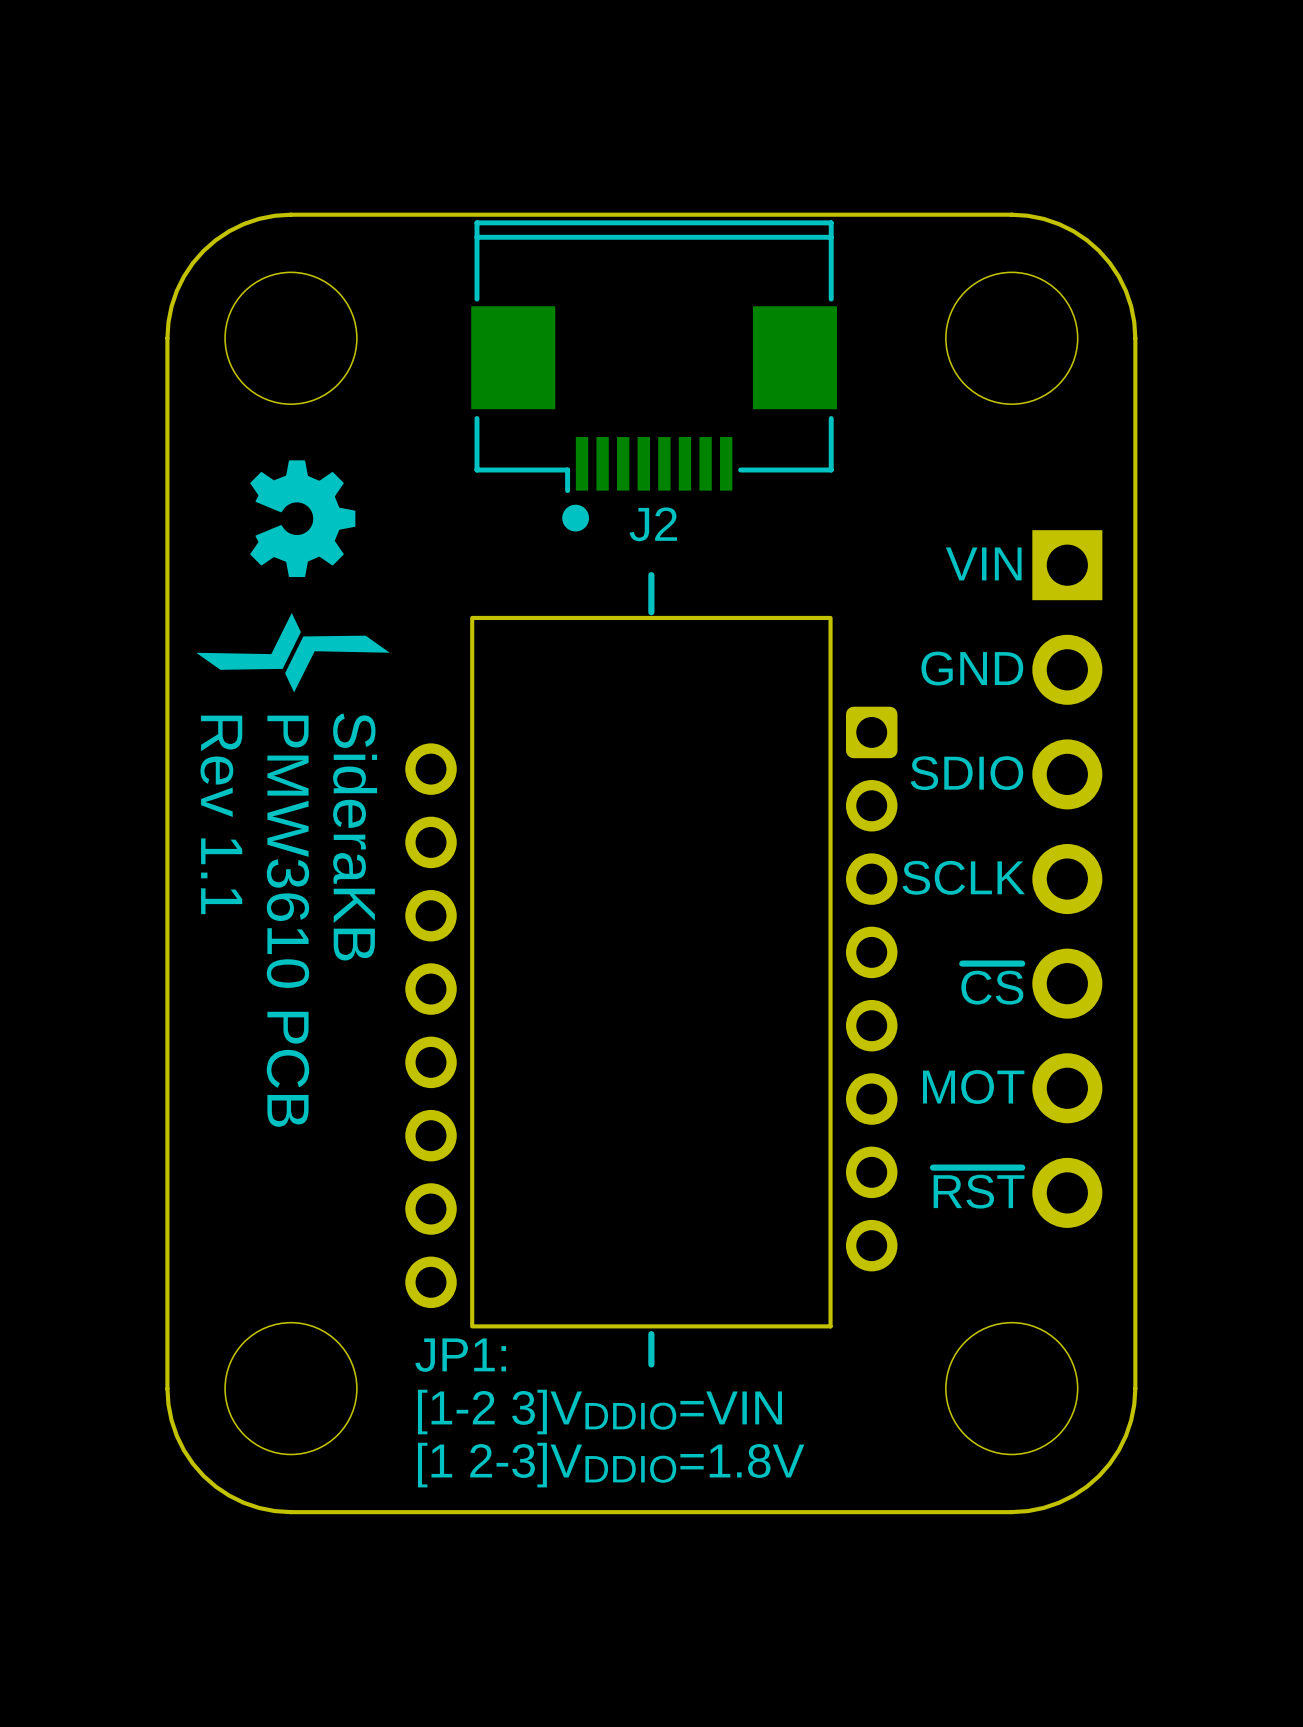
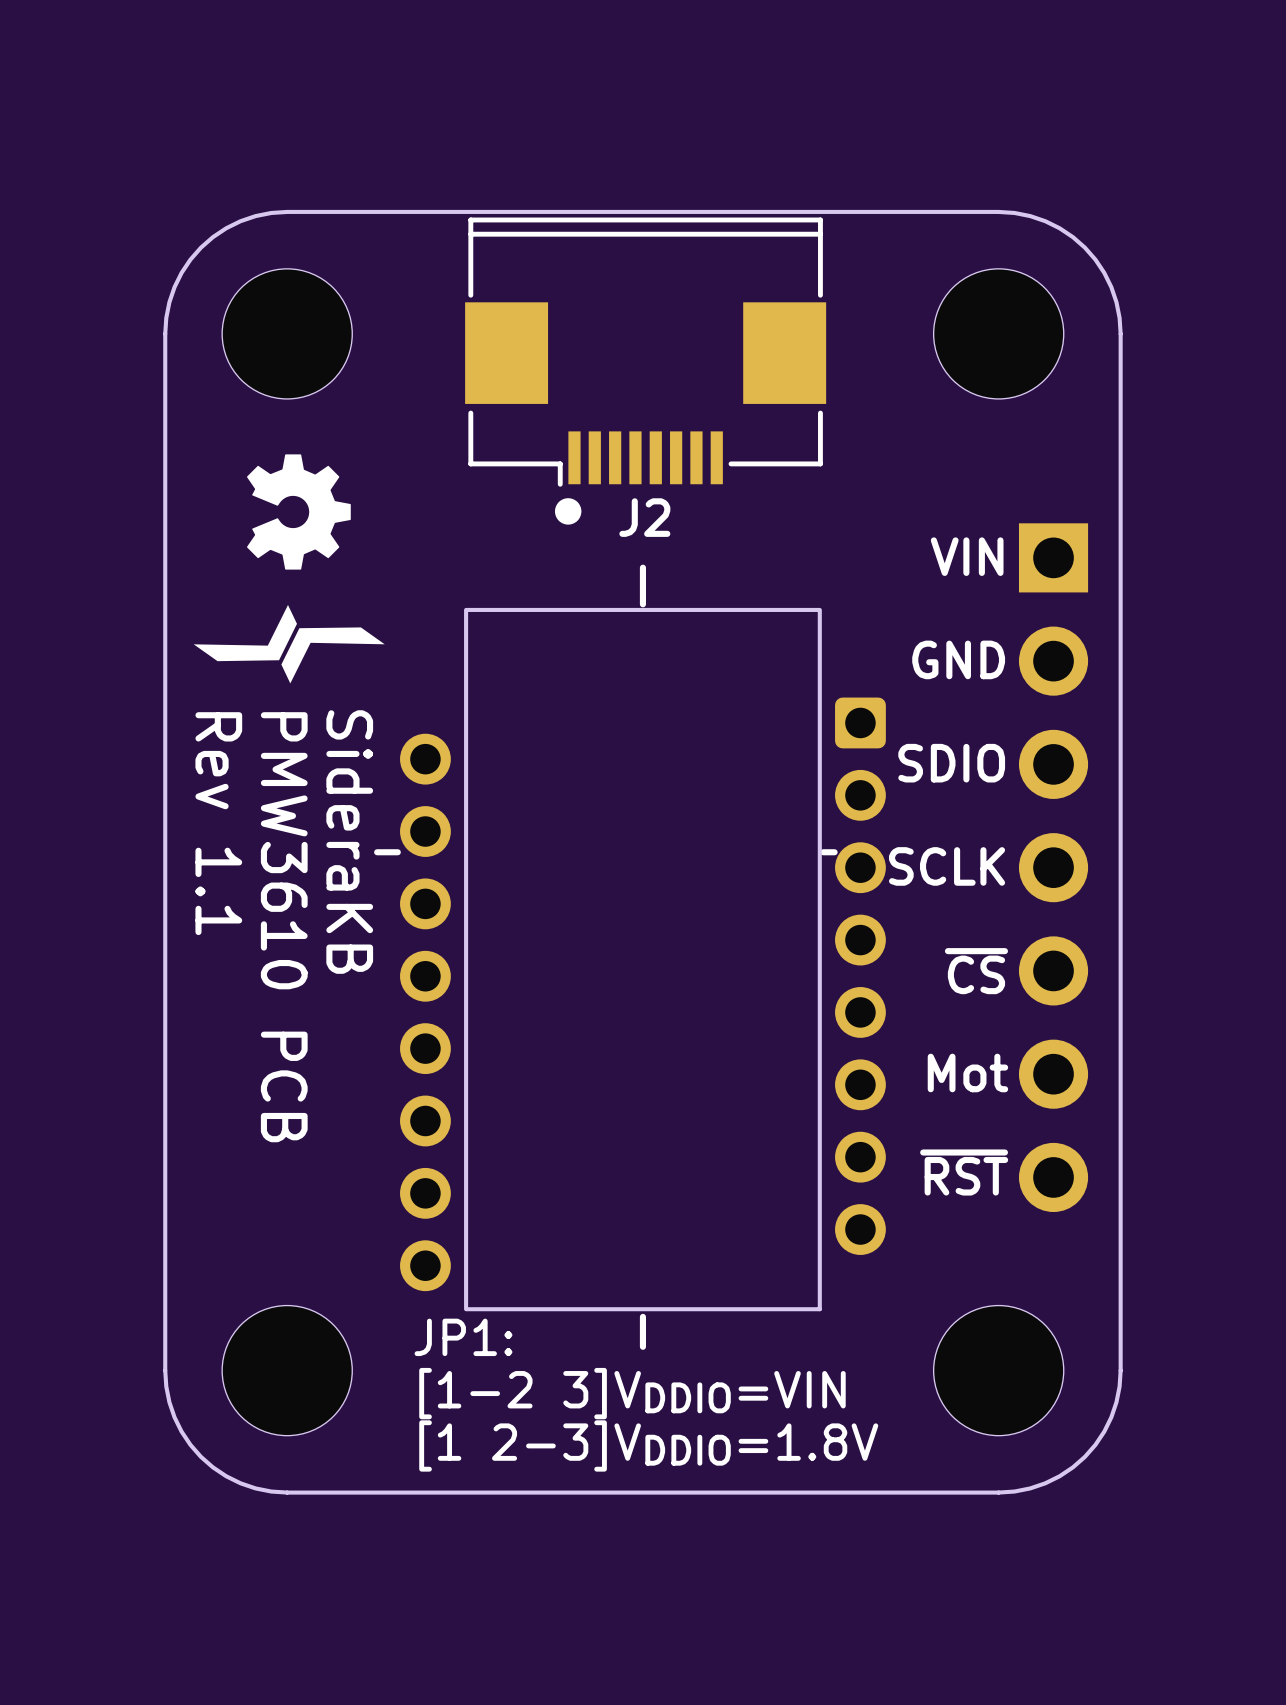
line: none -> (397, 852) (377, 852)
line: none -> (834, 852) (823, 852)
text: MOT (973, 1087) -> Mot (967, 1072)

